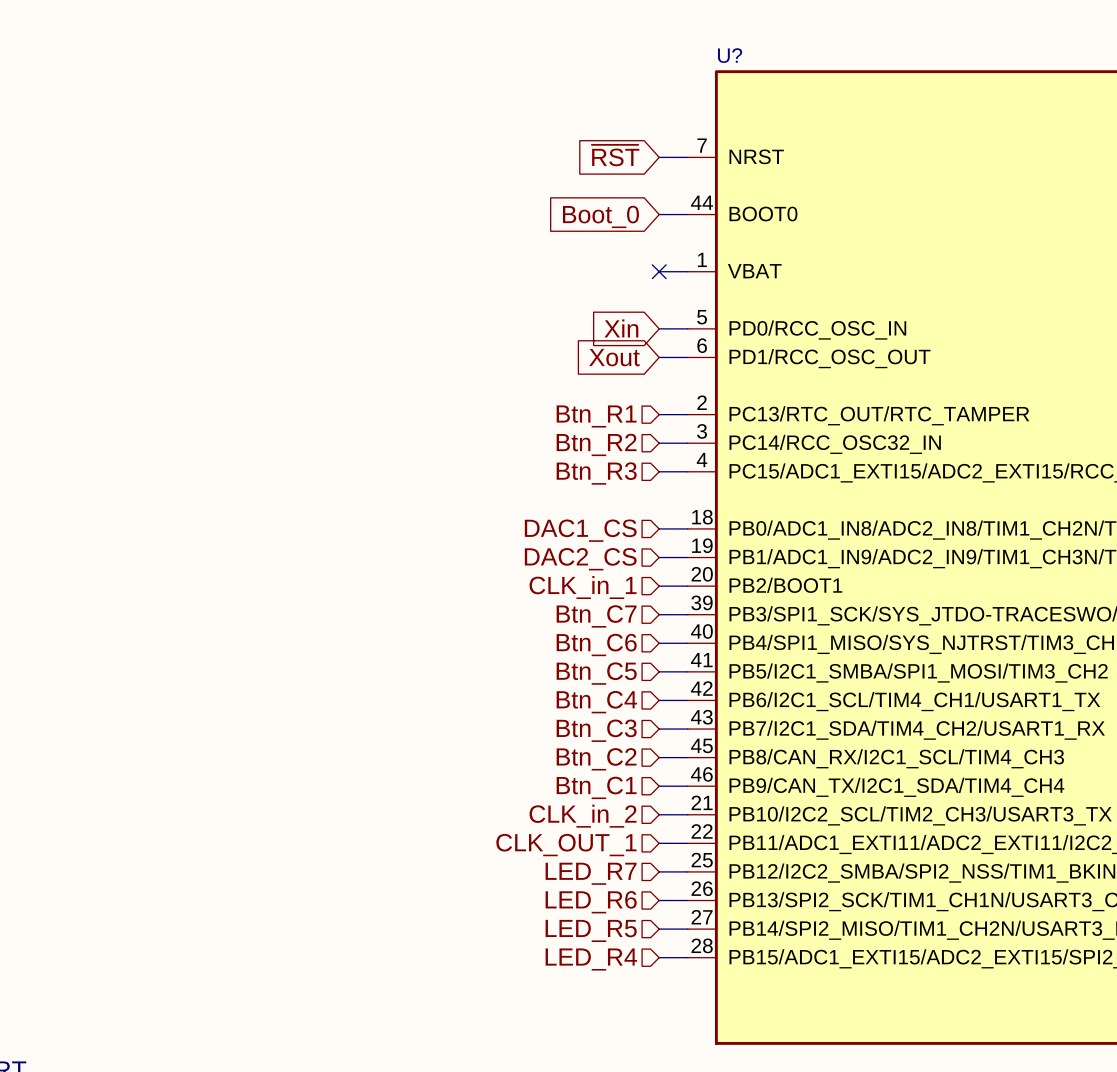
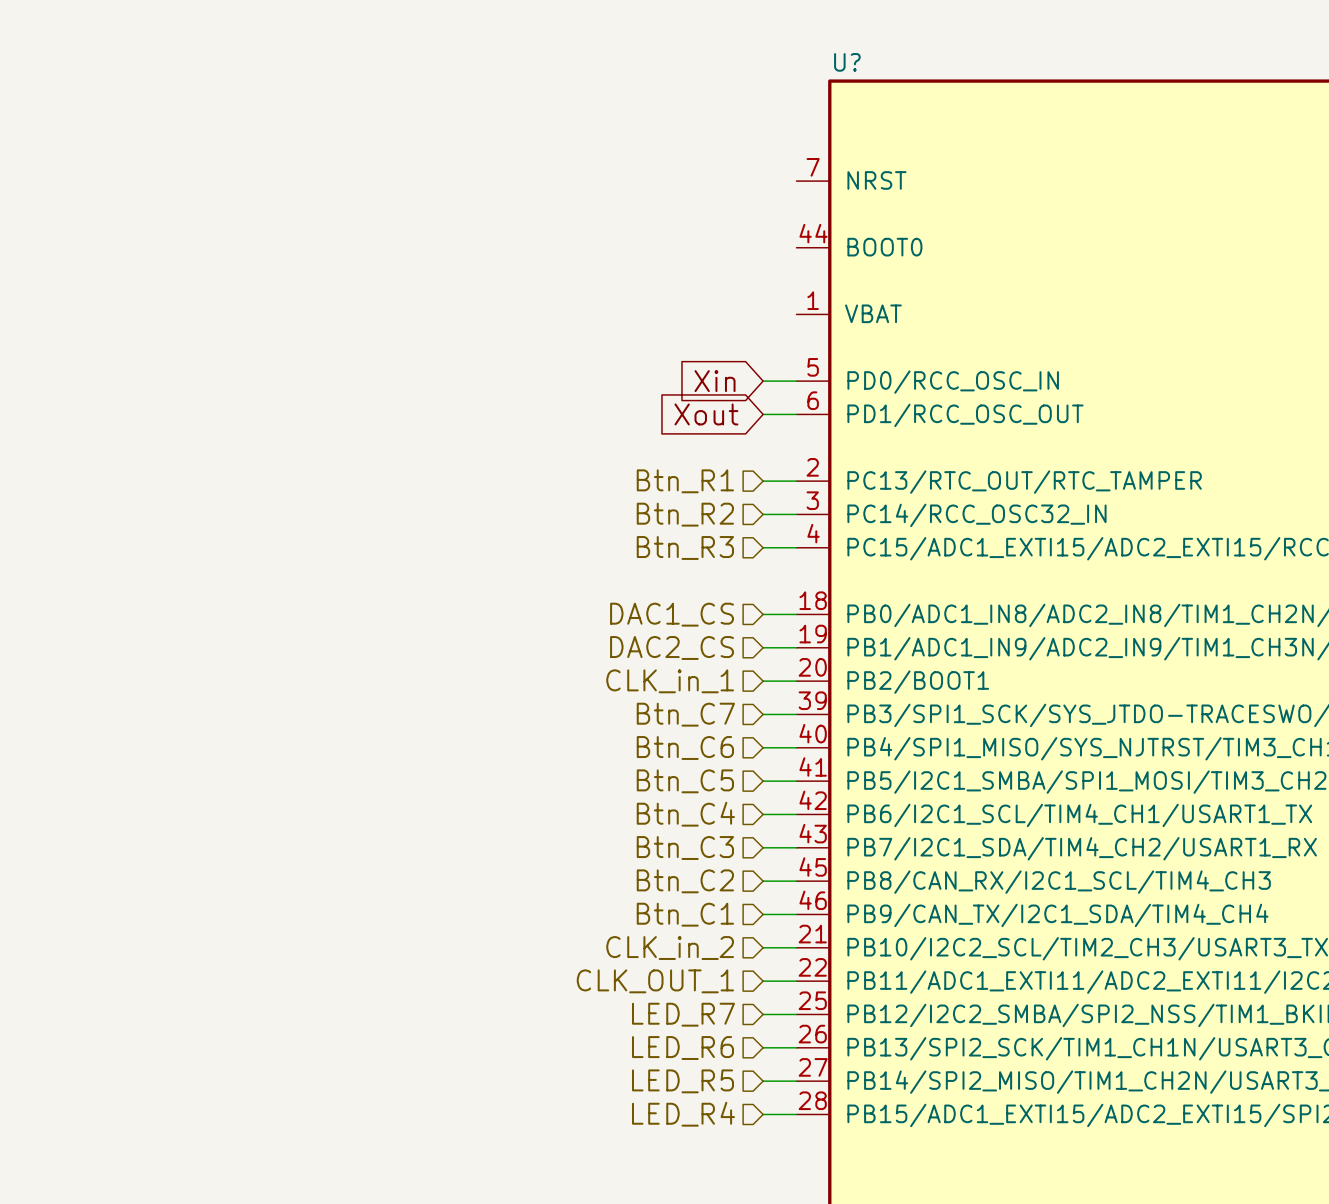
global label: ~{RST} (615, 155) -> none
wire: (659, 157) (687, 157) -> none
wire: (659, 214) (687, 214) -> none
global label: Boot_0 (600, 216) -> none
wire: (659, 271) (687, 271) -> none
no-connect mark: (659, 271) -> none

